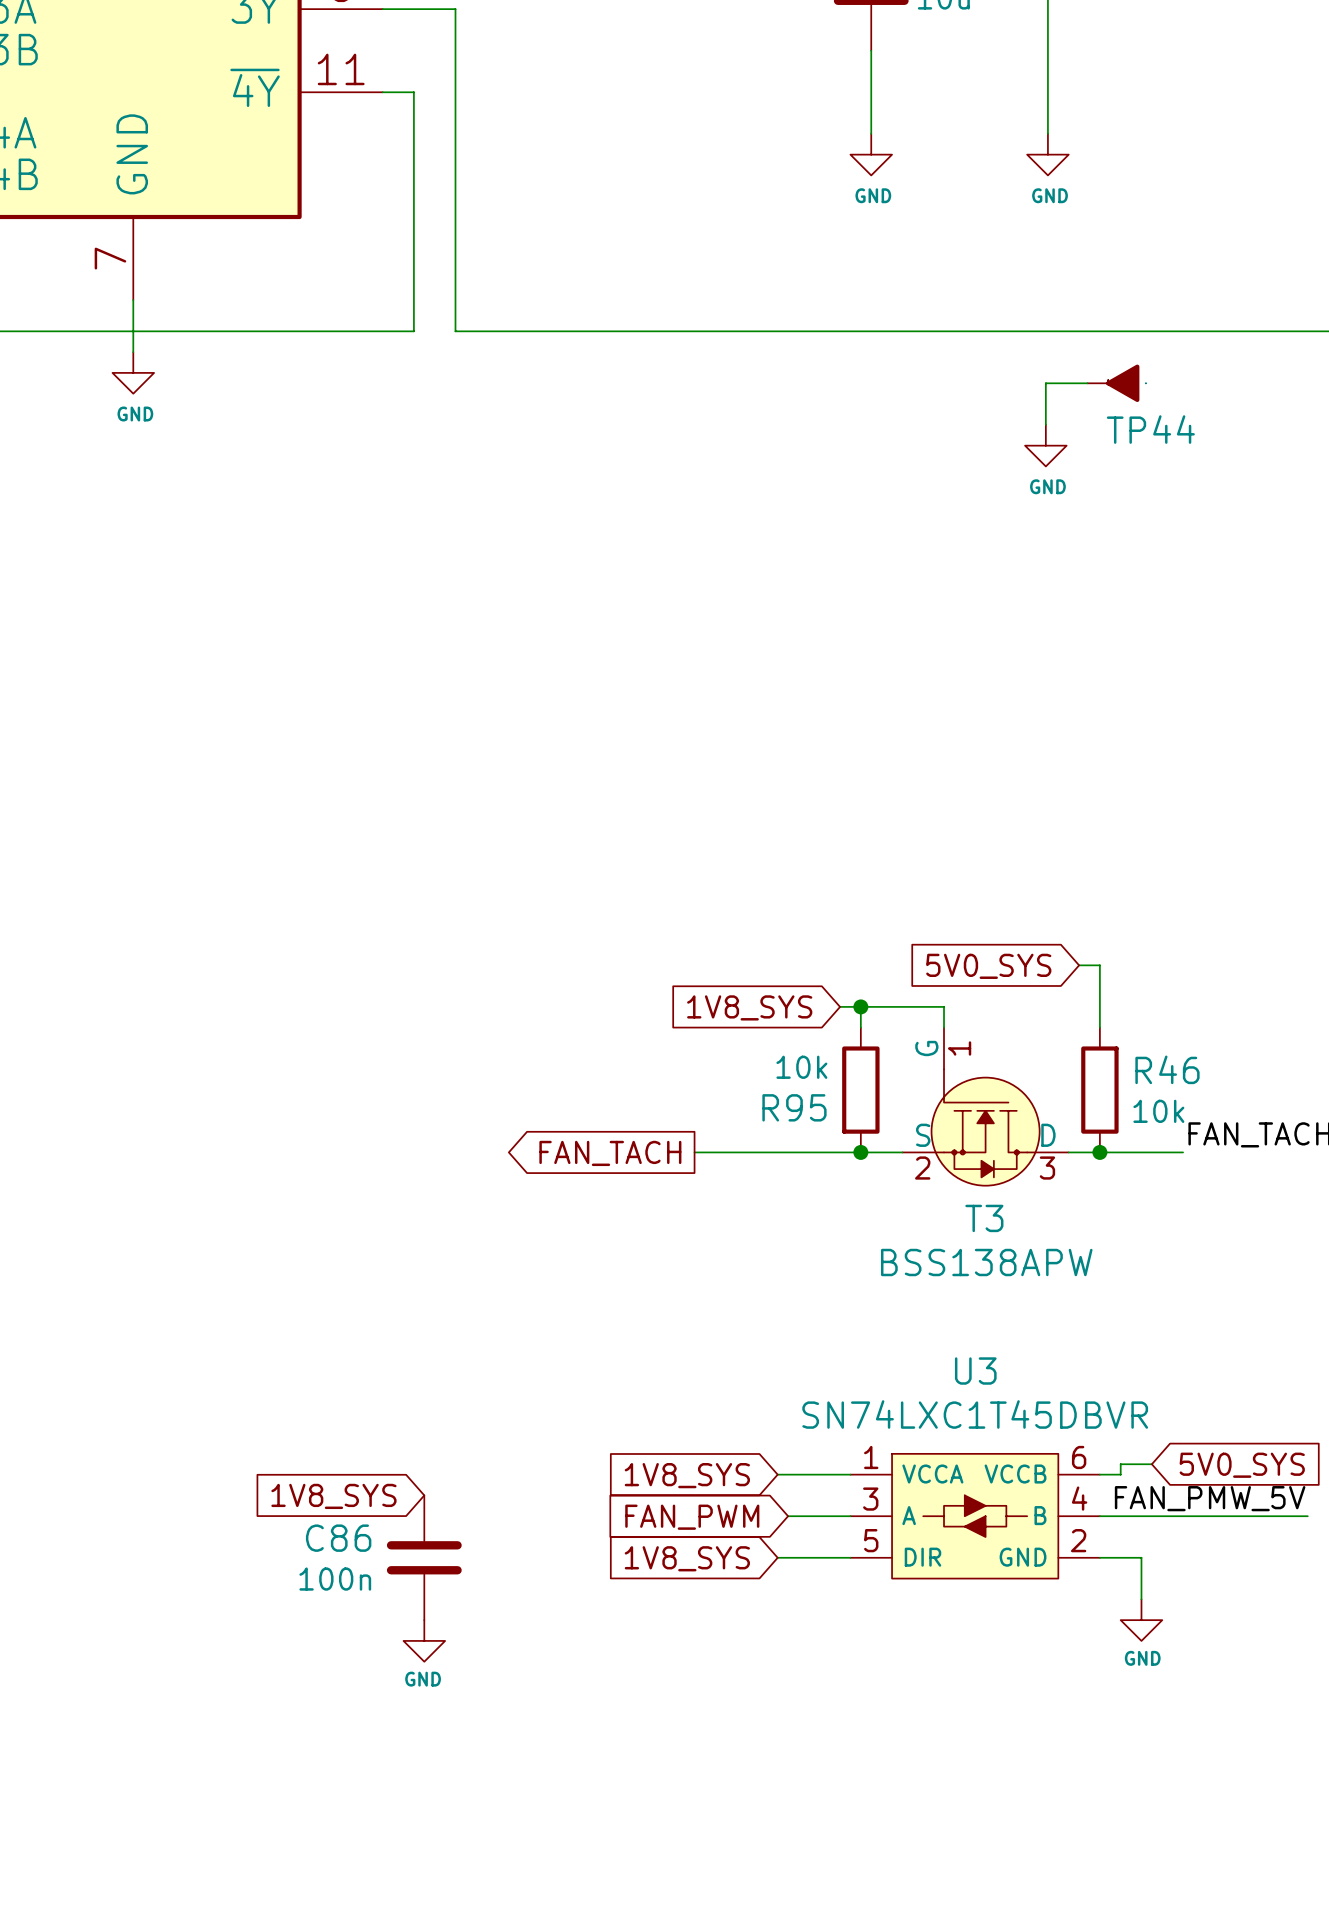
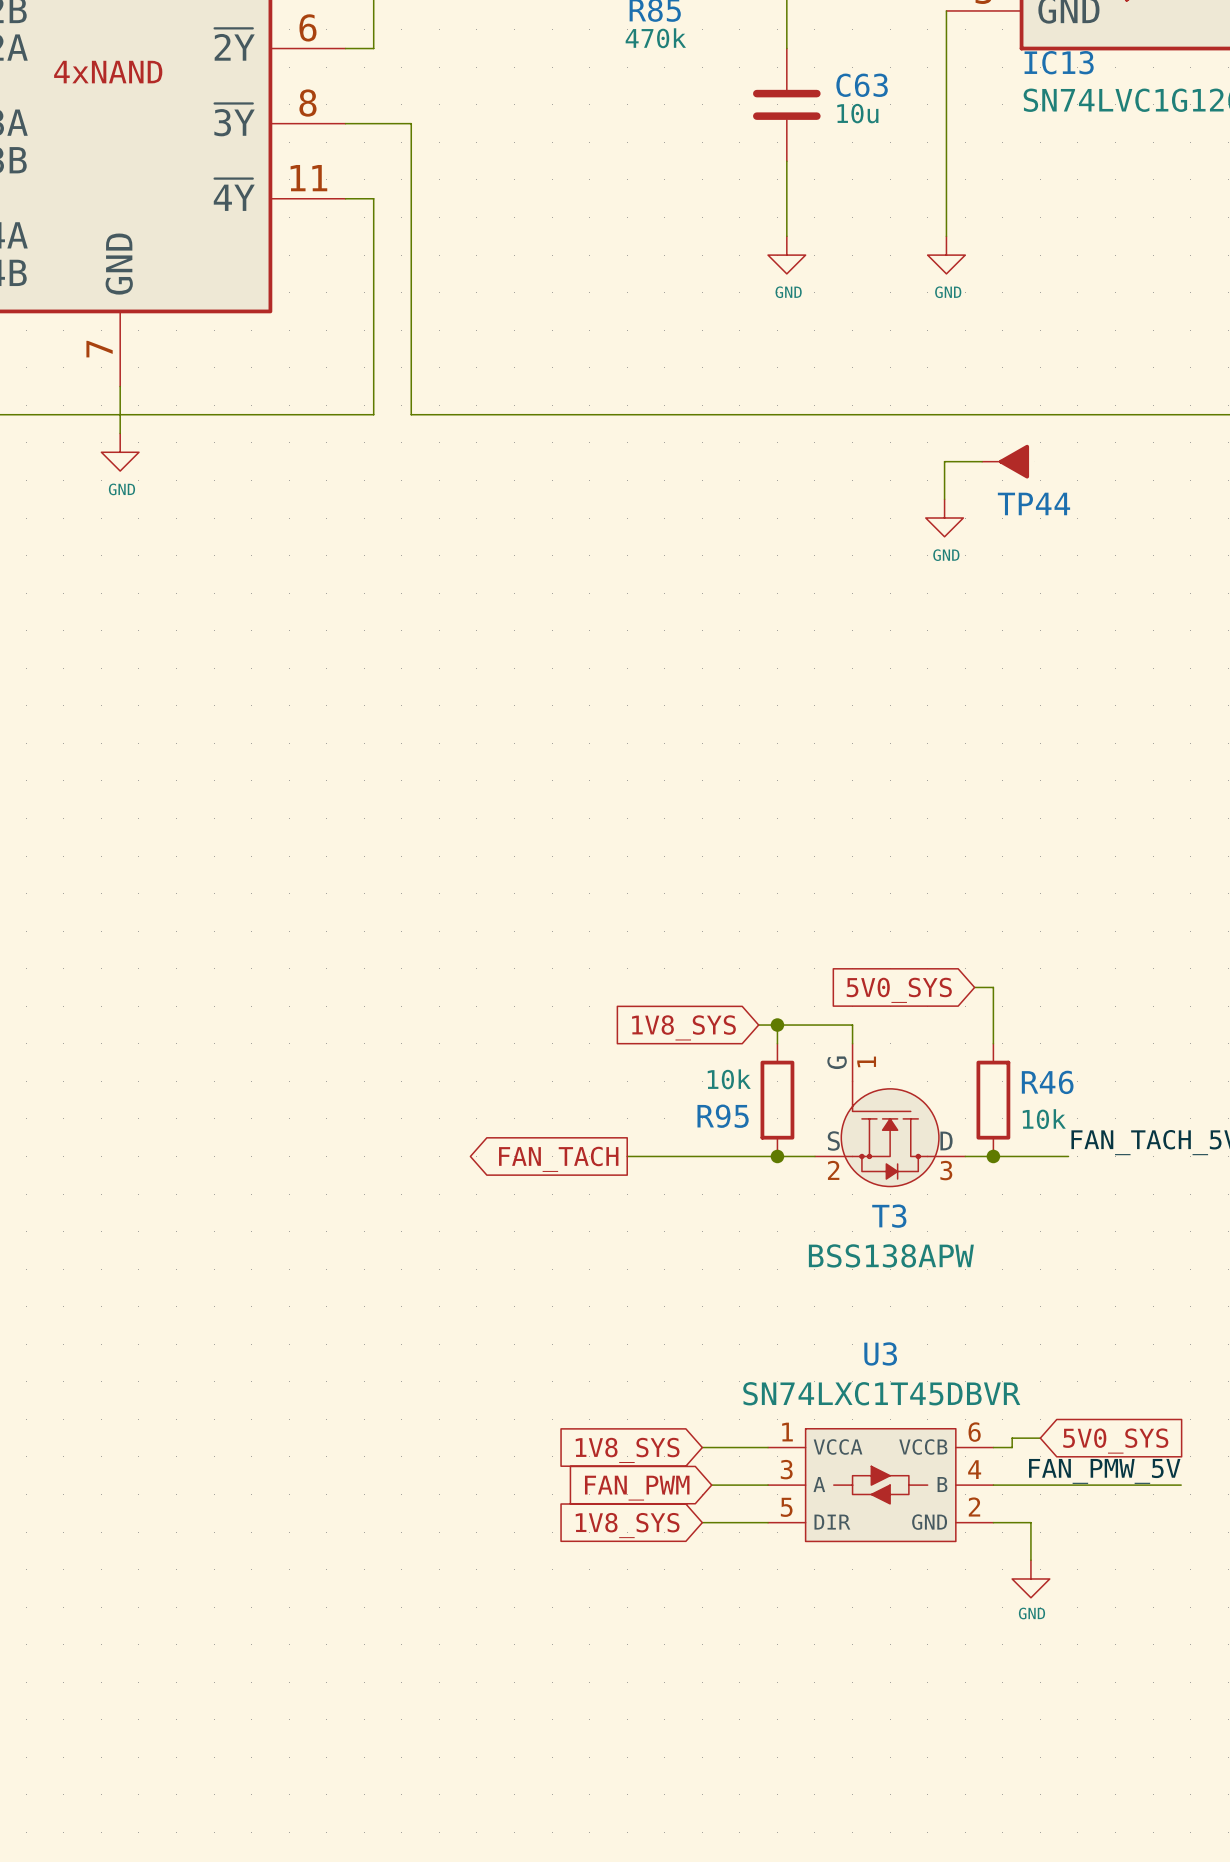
global label: 1V8_SYS (333, 1496) -> none
C86: (424, 1557) -> none
power symbol: GND (424, 1640) -> none

